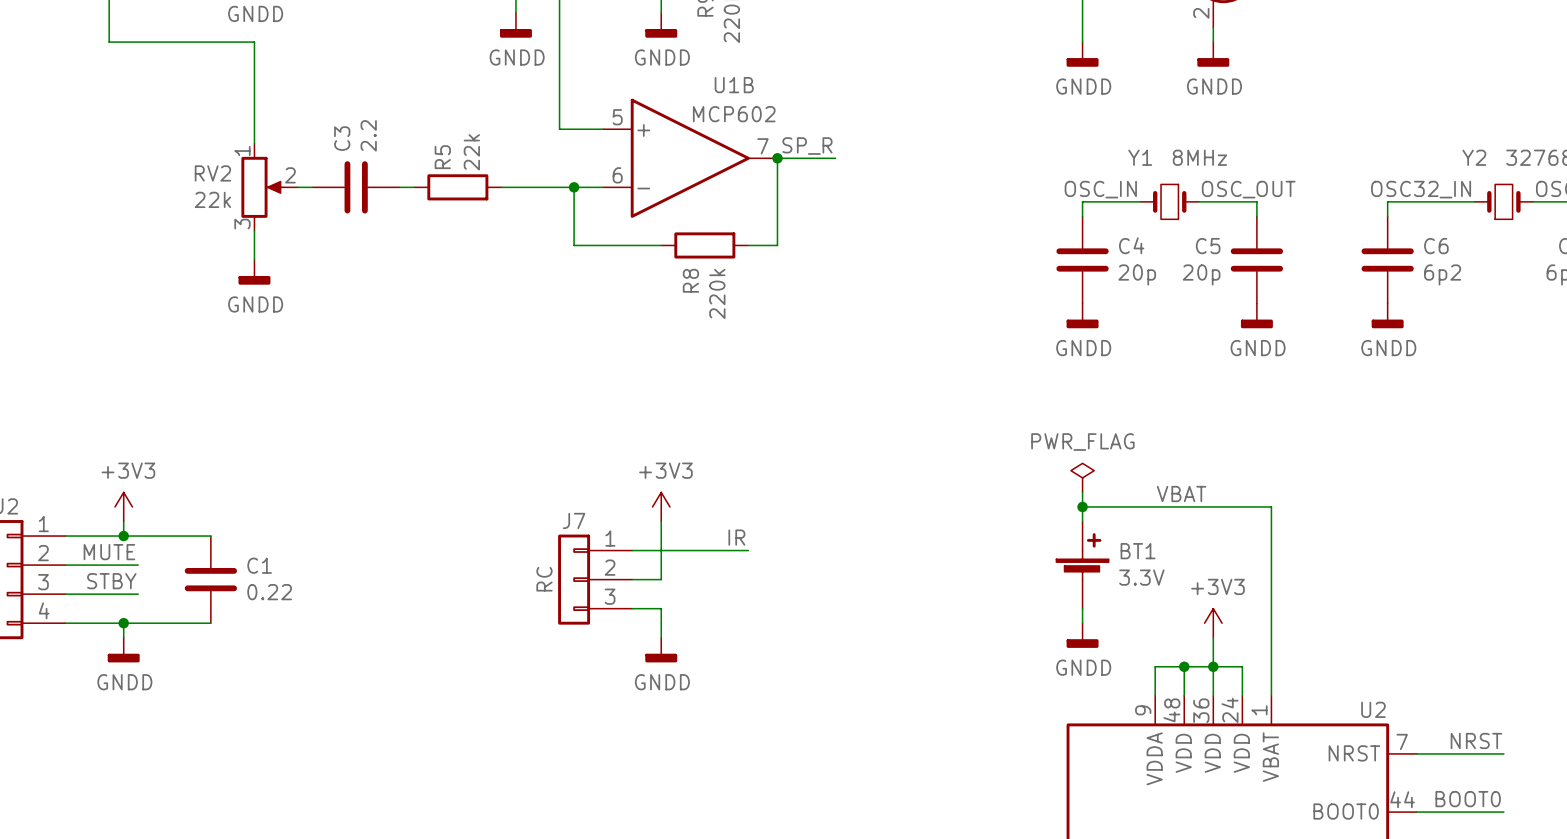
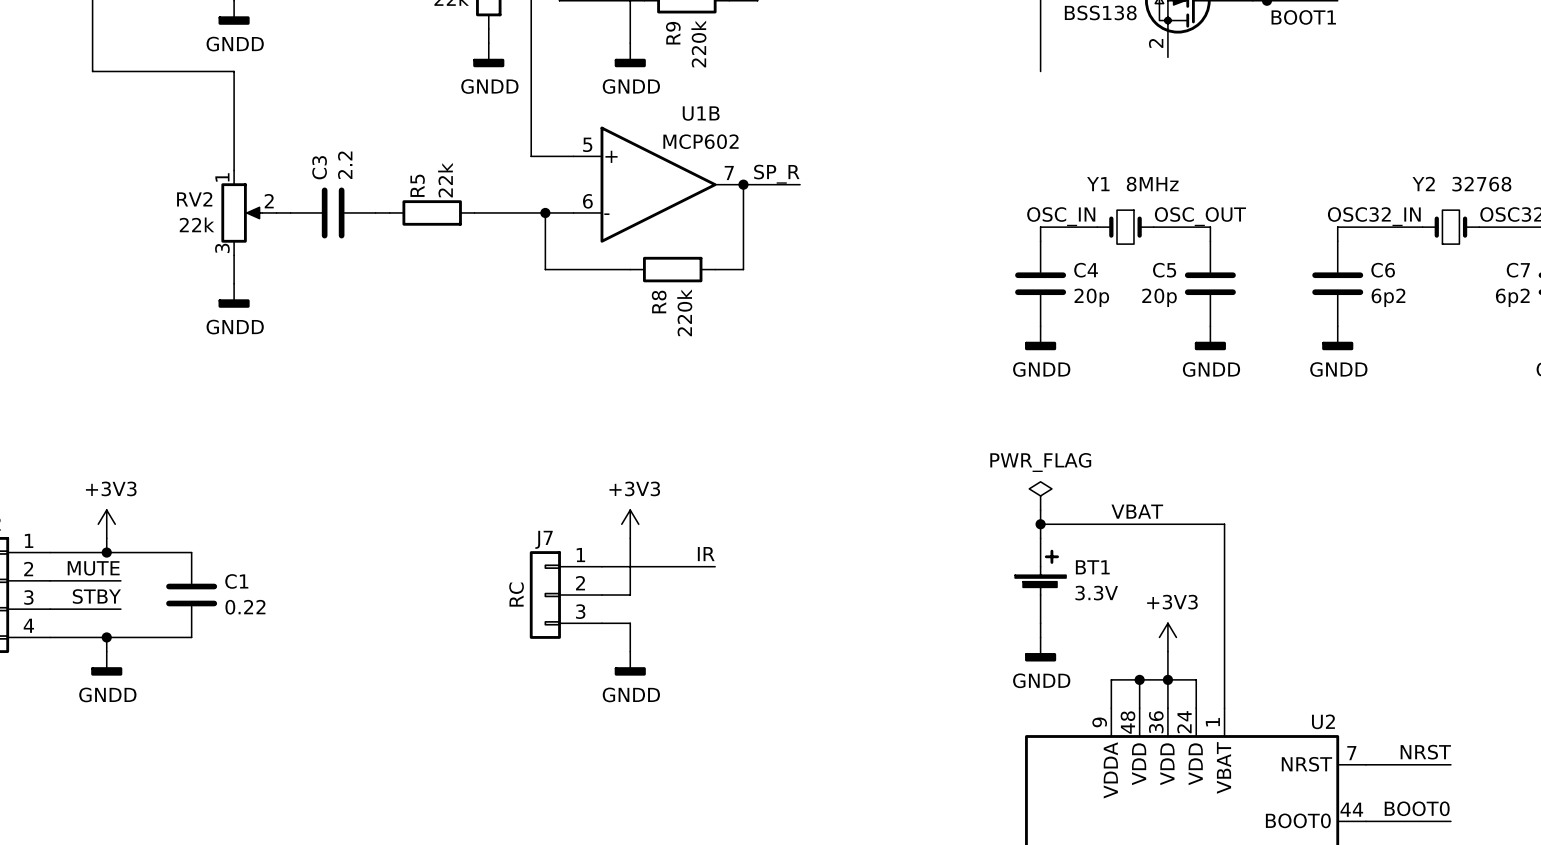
wire: (1213, 27) (1213, 42) -> none
power symbol: GNDD (1082, 54) -> none
power symbol: GNDD (1213, 54) -> none

